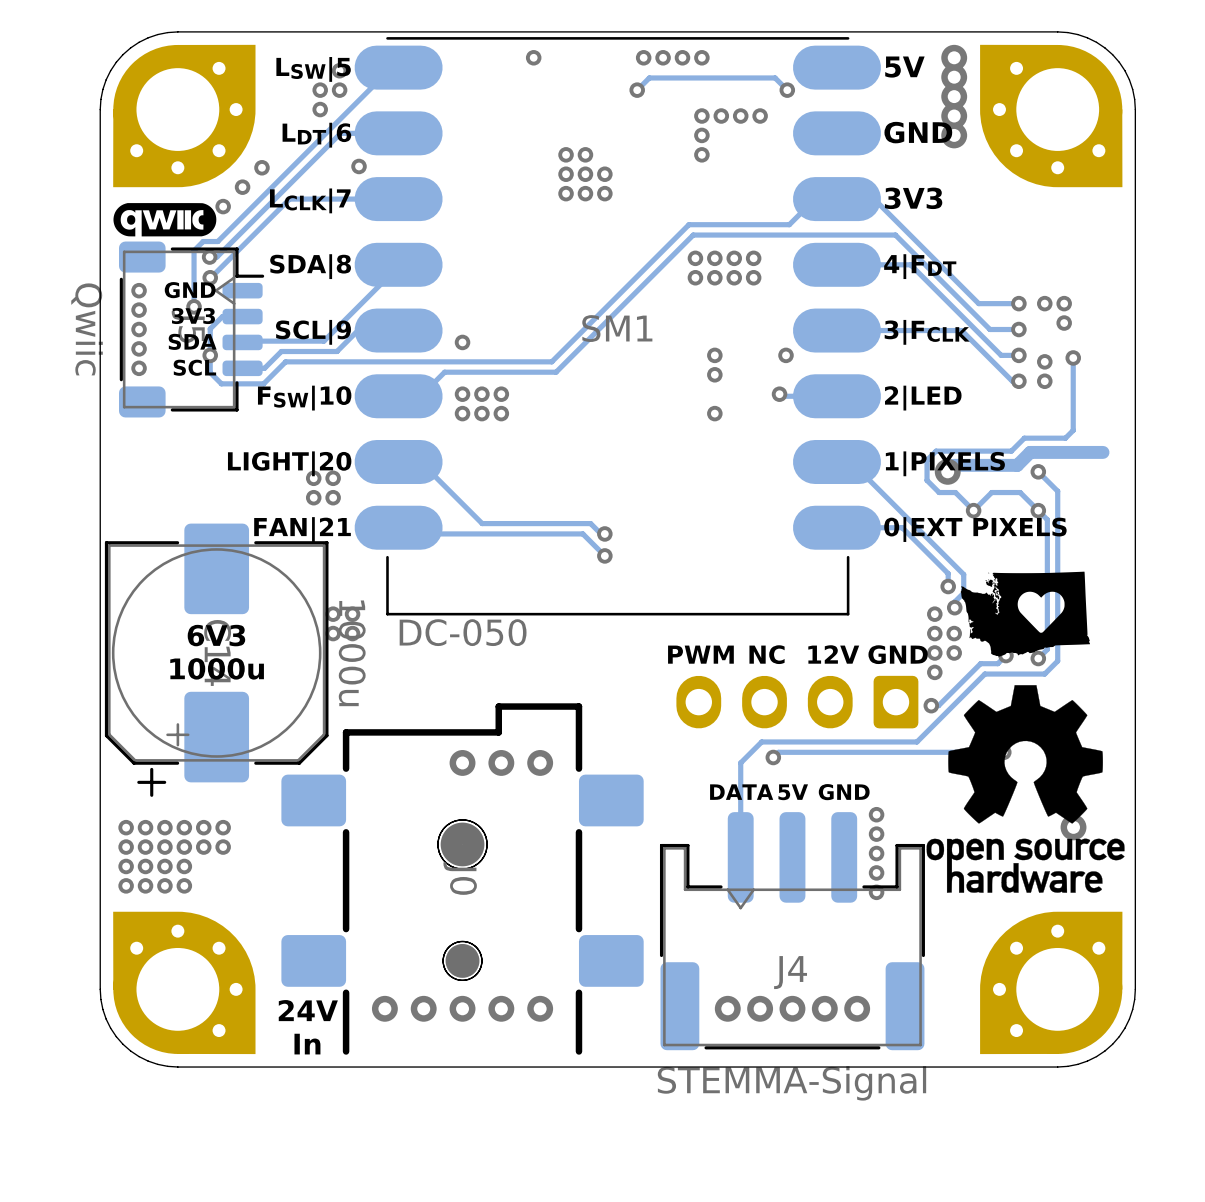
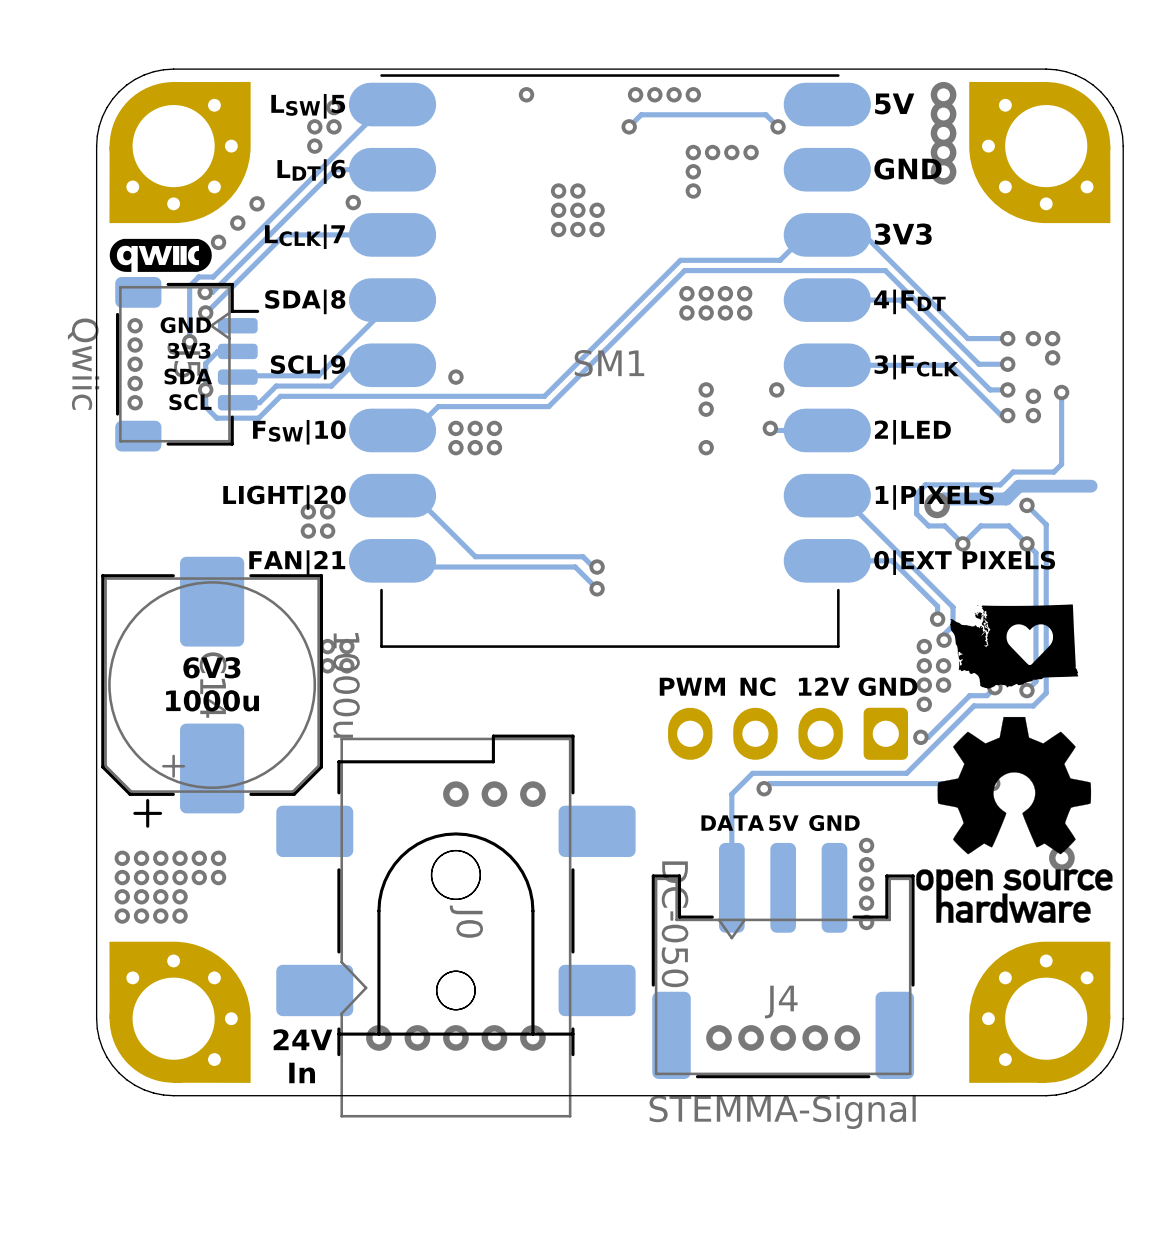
J0 value position: DC-050 (463, 632) -> DC-050 (675, 924)
J0 footprint: [281, 703, 644, 1055] -> [276, 734, 636, 1118]

